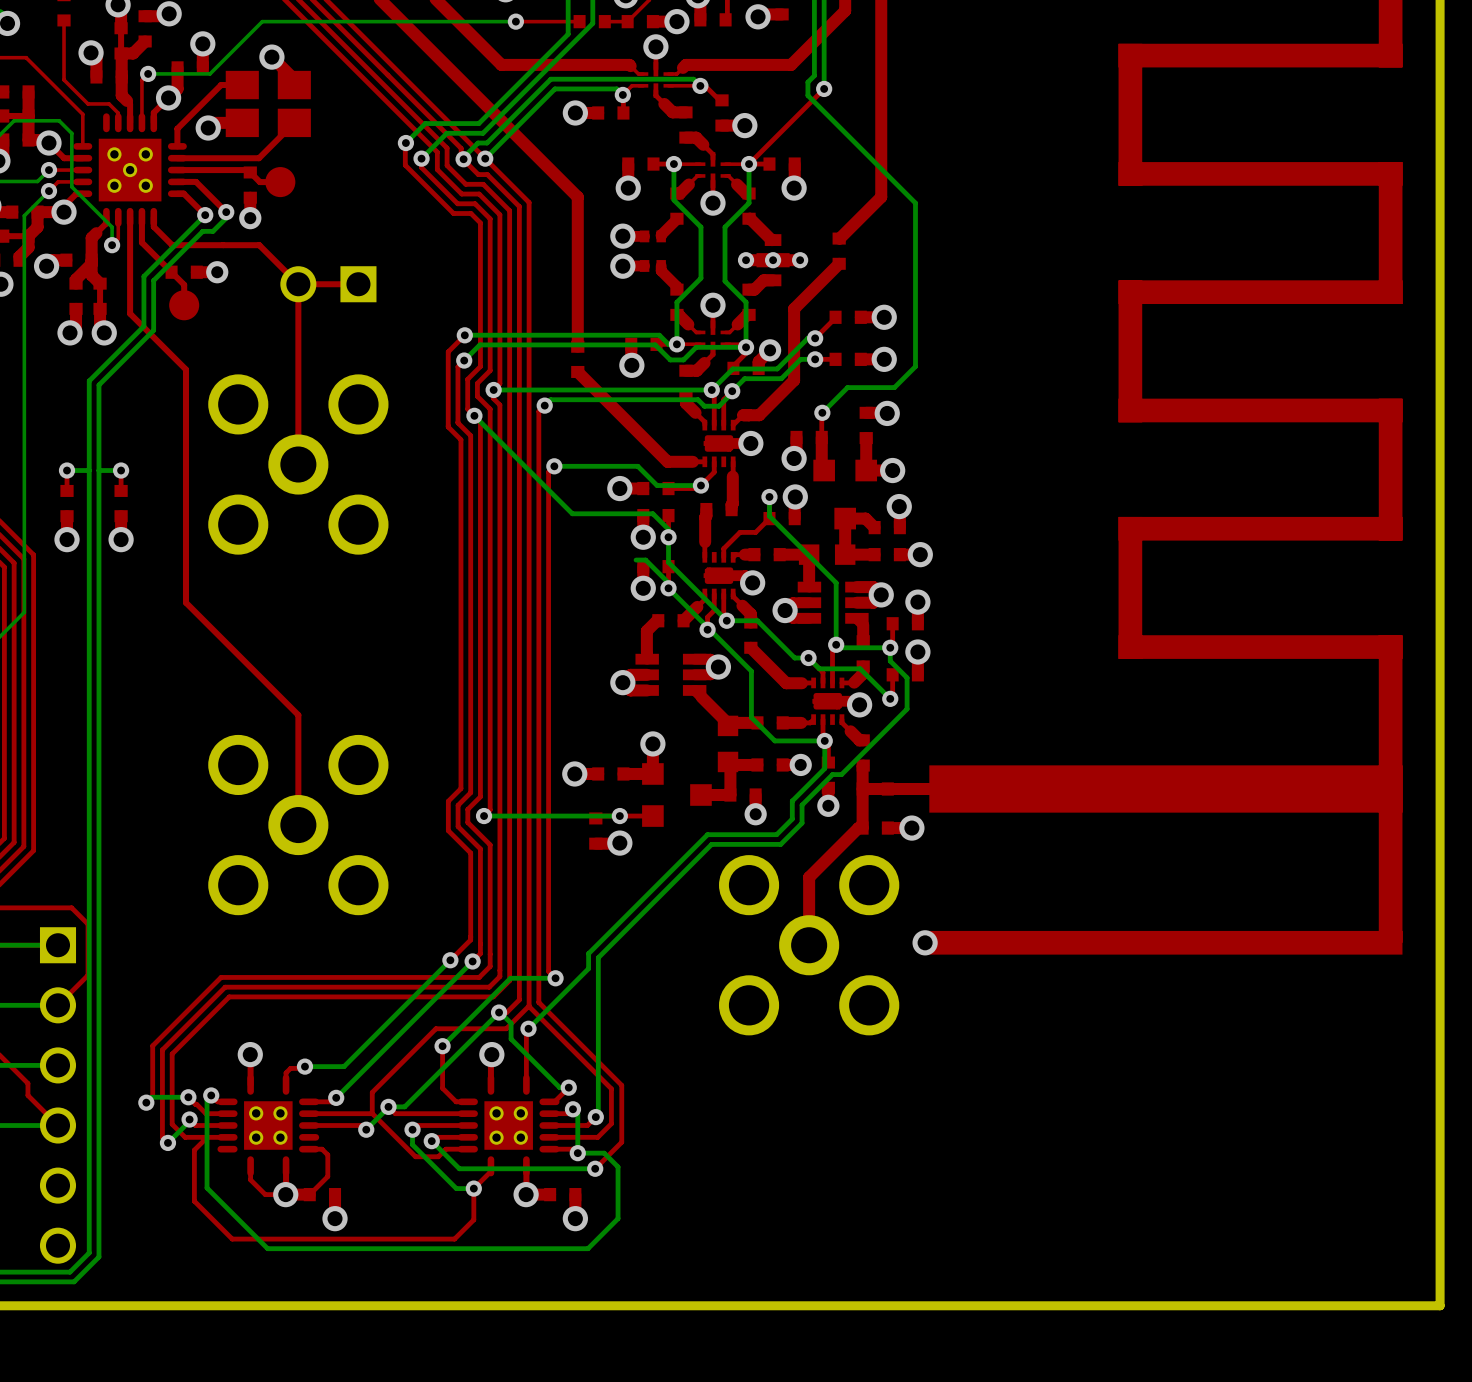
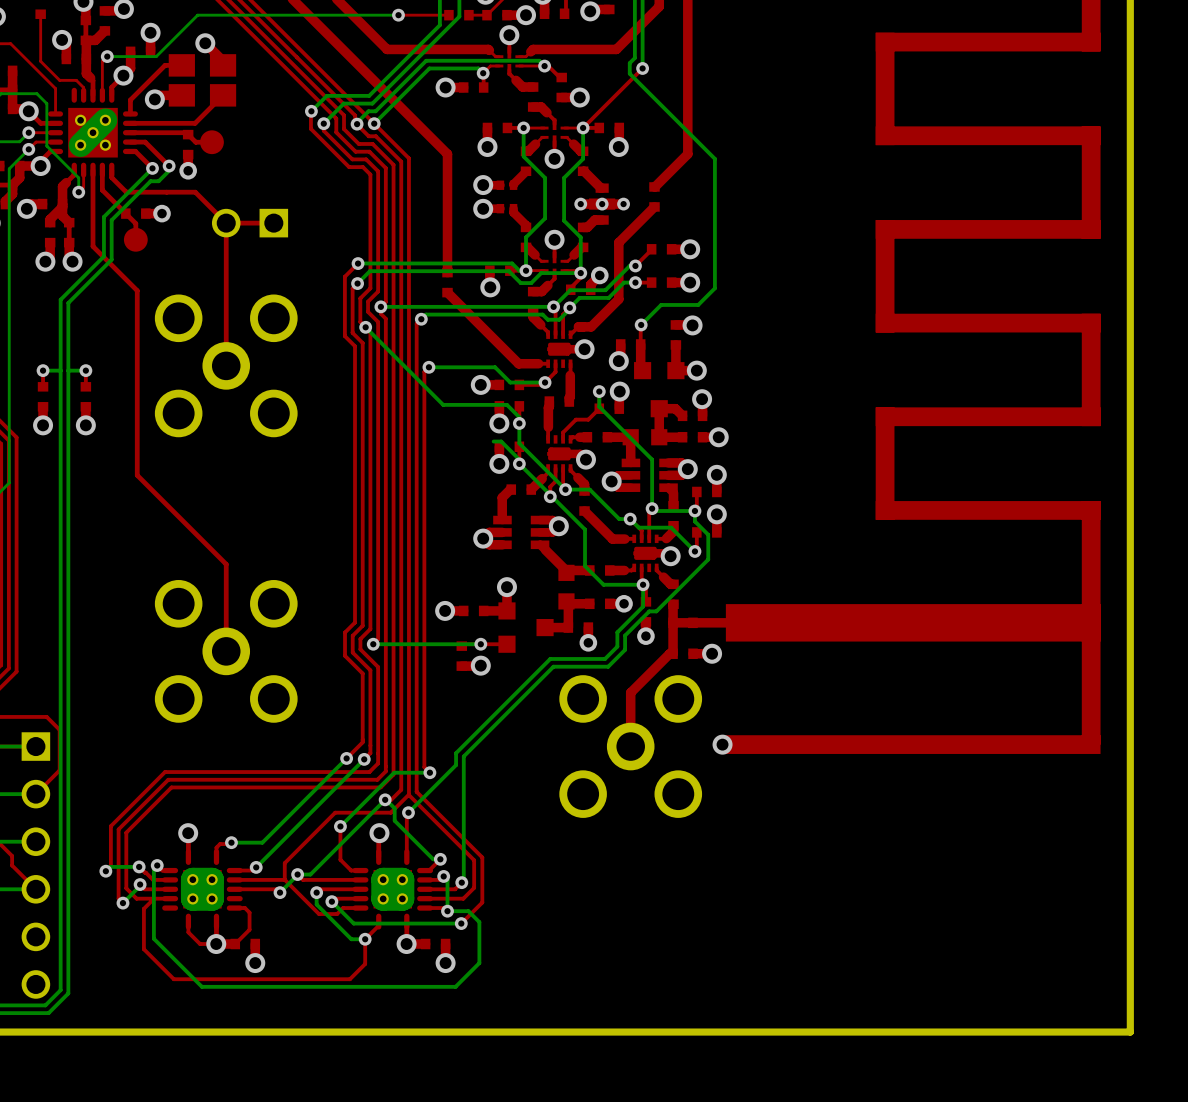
bottom track: none -> (105, 120) (80, 145)
bottom track: none -> (212, 879) (192, 879) (192, 898) (212, 898) (212, 879)
bottom track: none -> (402, 879) (383, 879) (383, 898) (402, 898) (402, 879)

